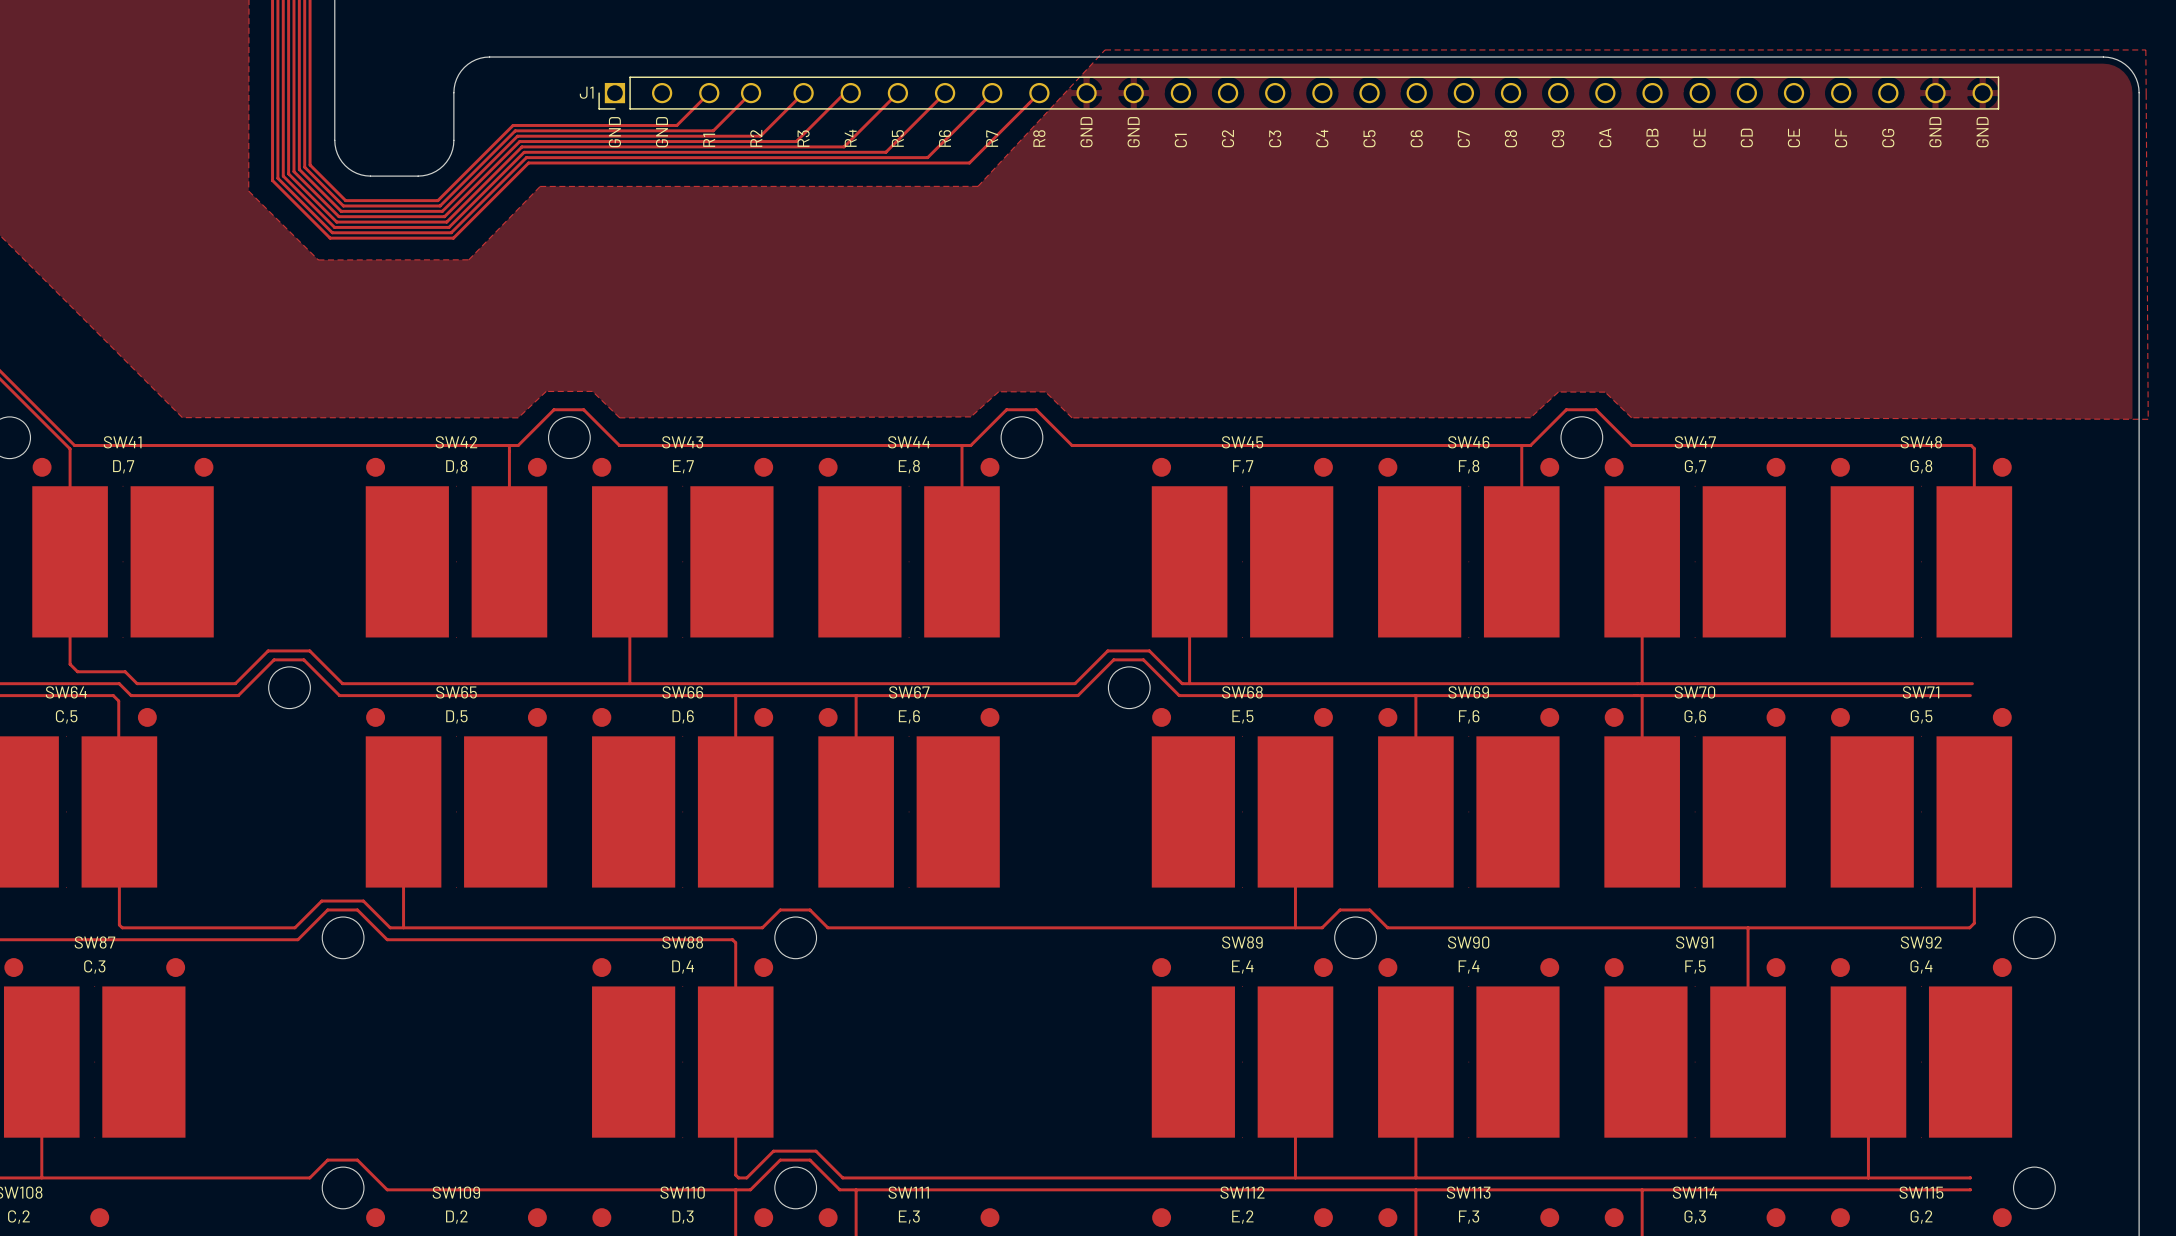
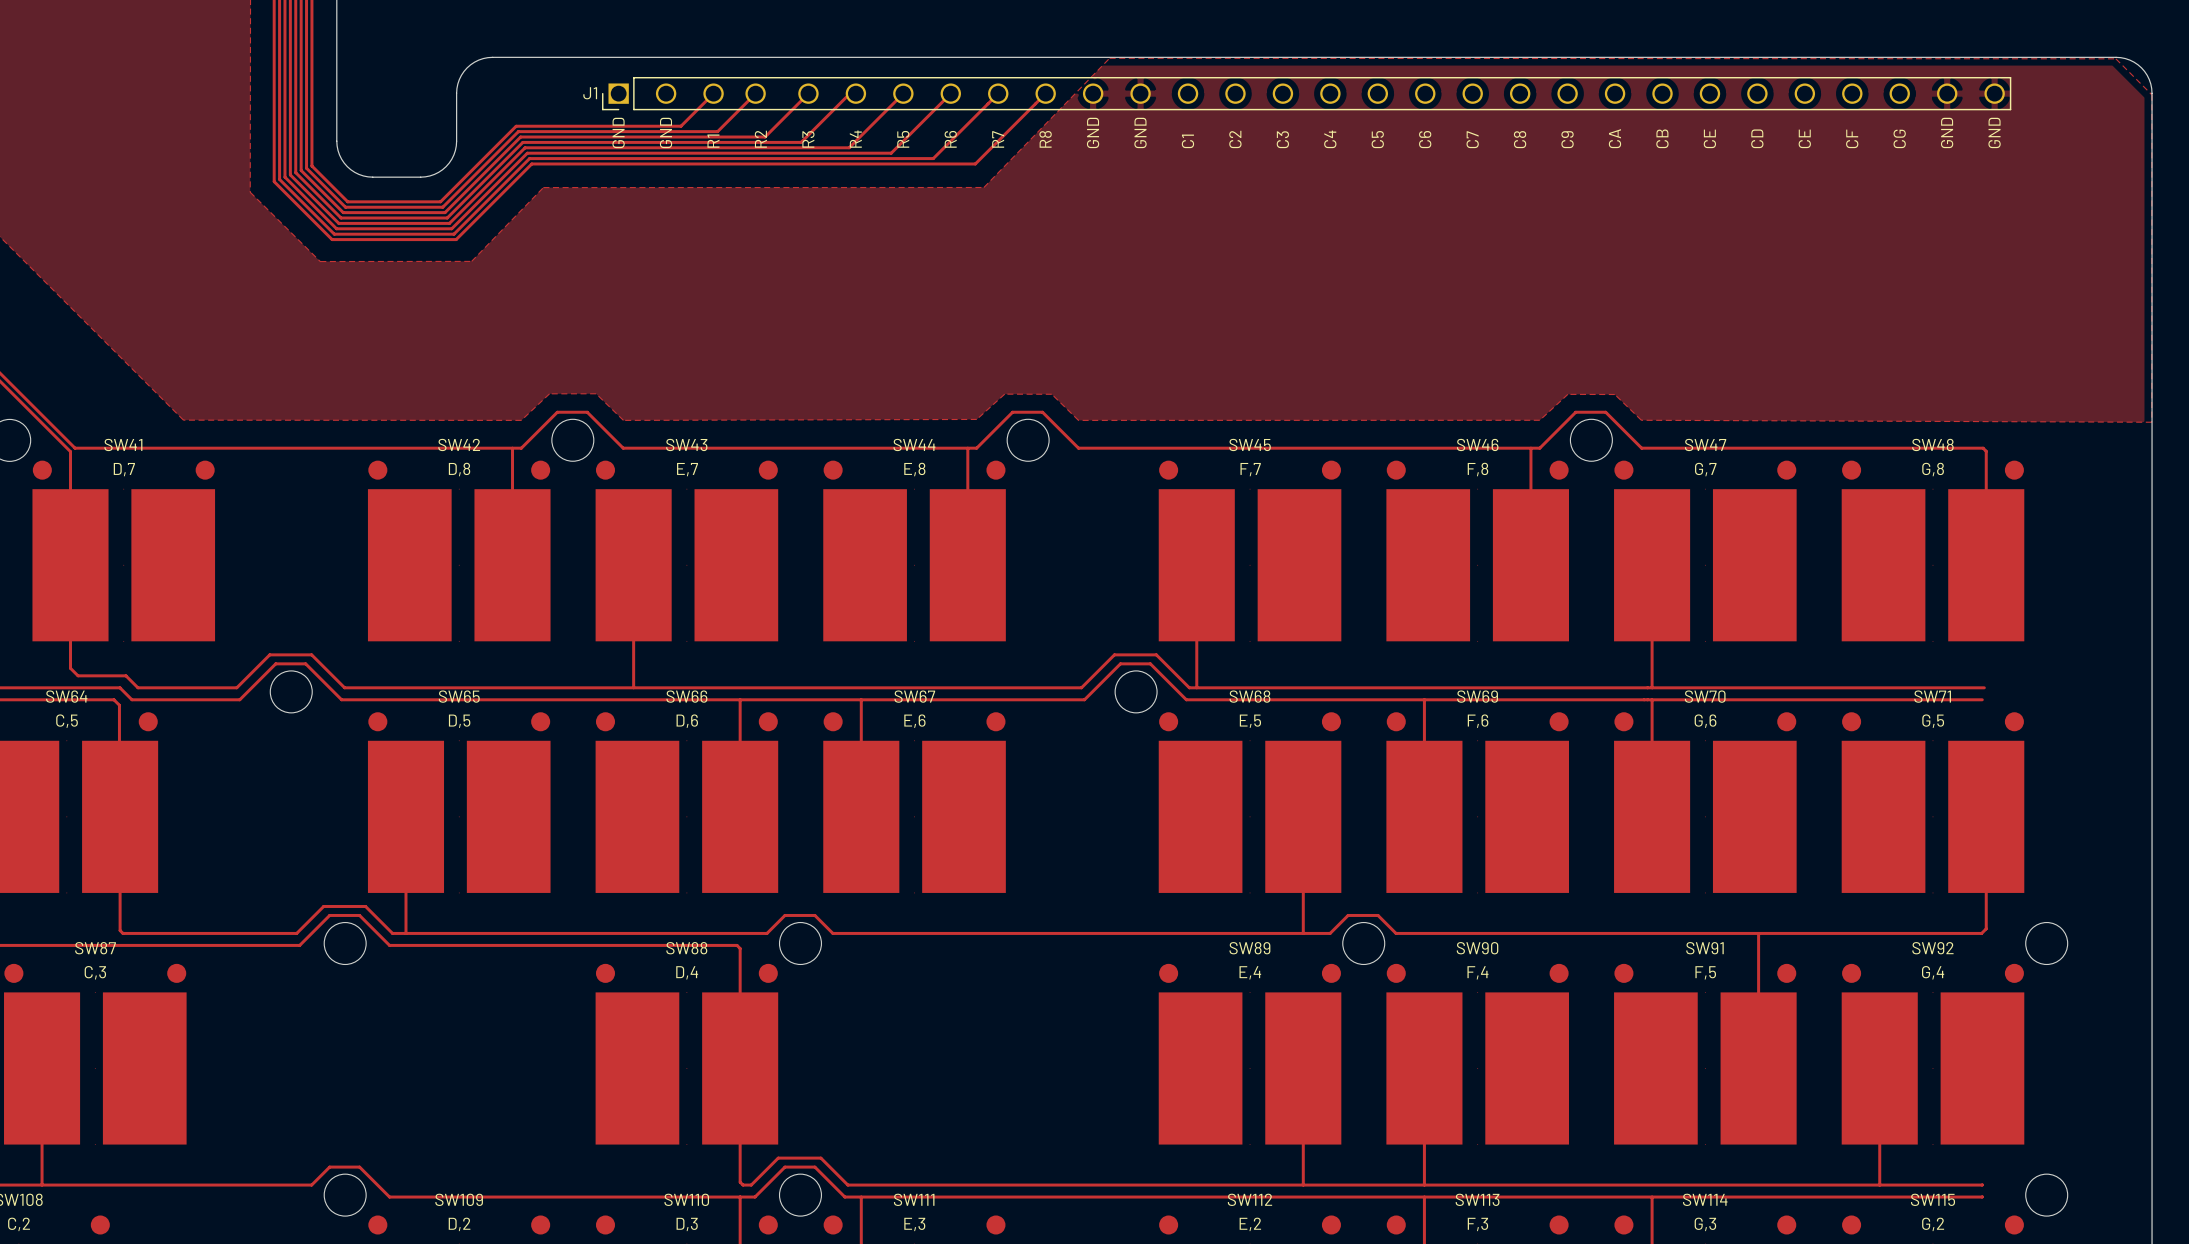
zone outline: (978, 186) (1105, 49) (2145, 49) (2148, 419) (1631, 417) -> (983, 187) (1109, 58) (2115, 58) (2151, 94) (2151, 422) (1641, 420)

